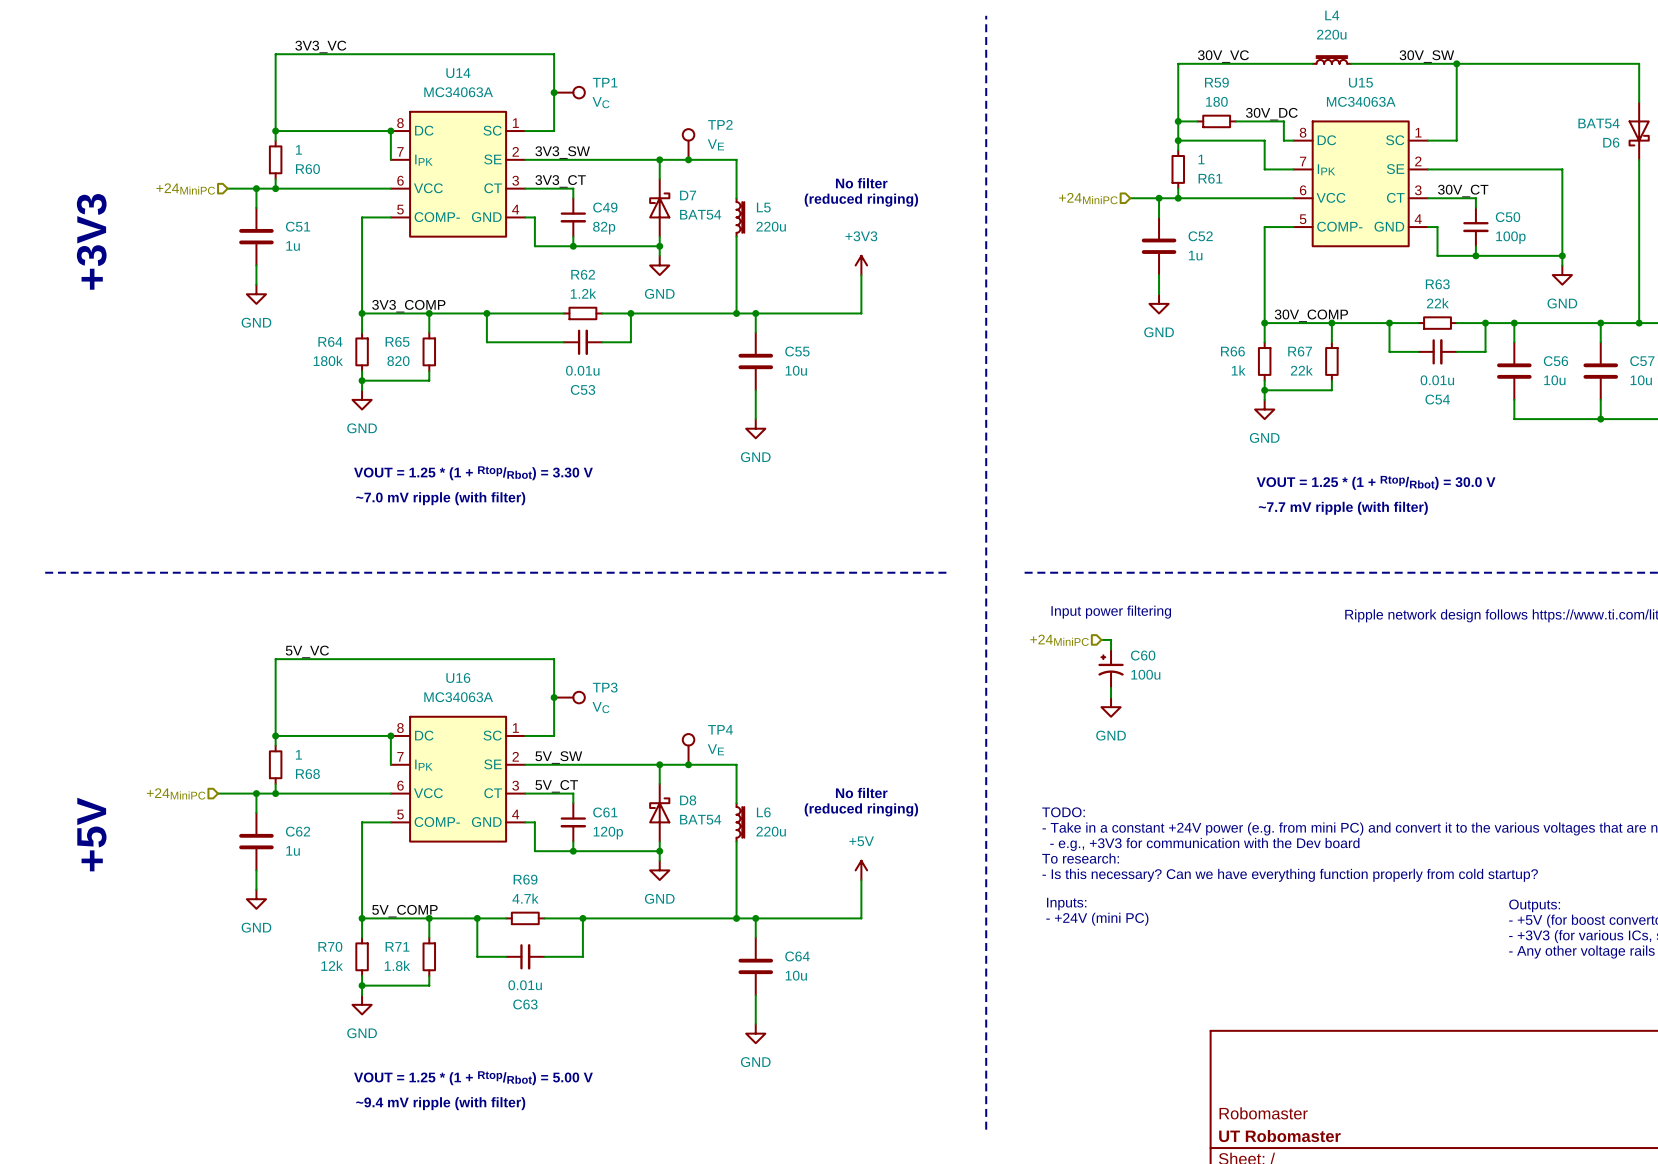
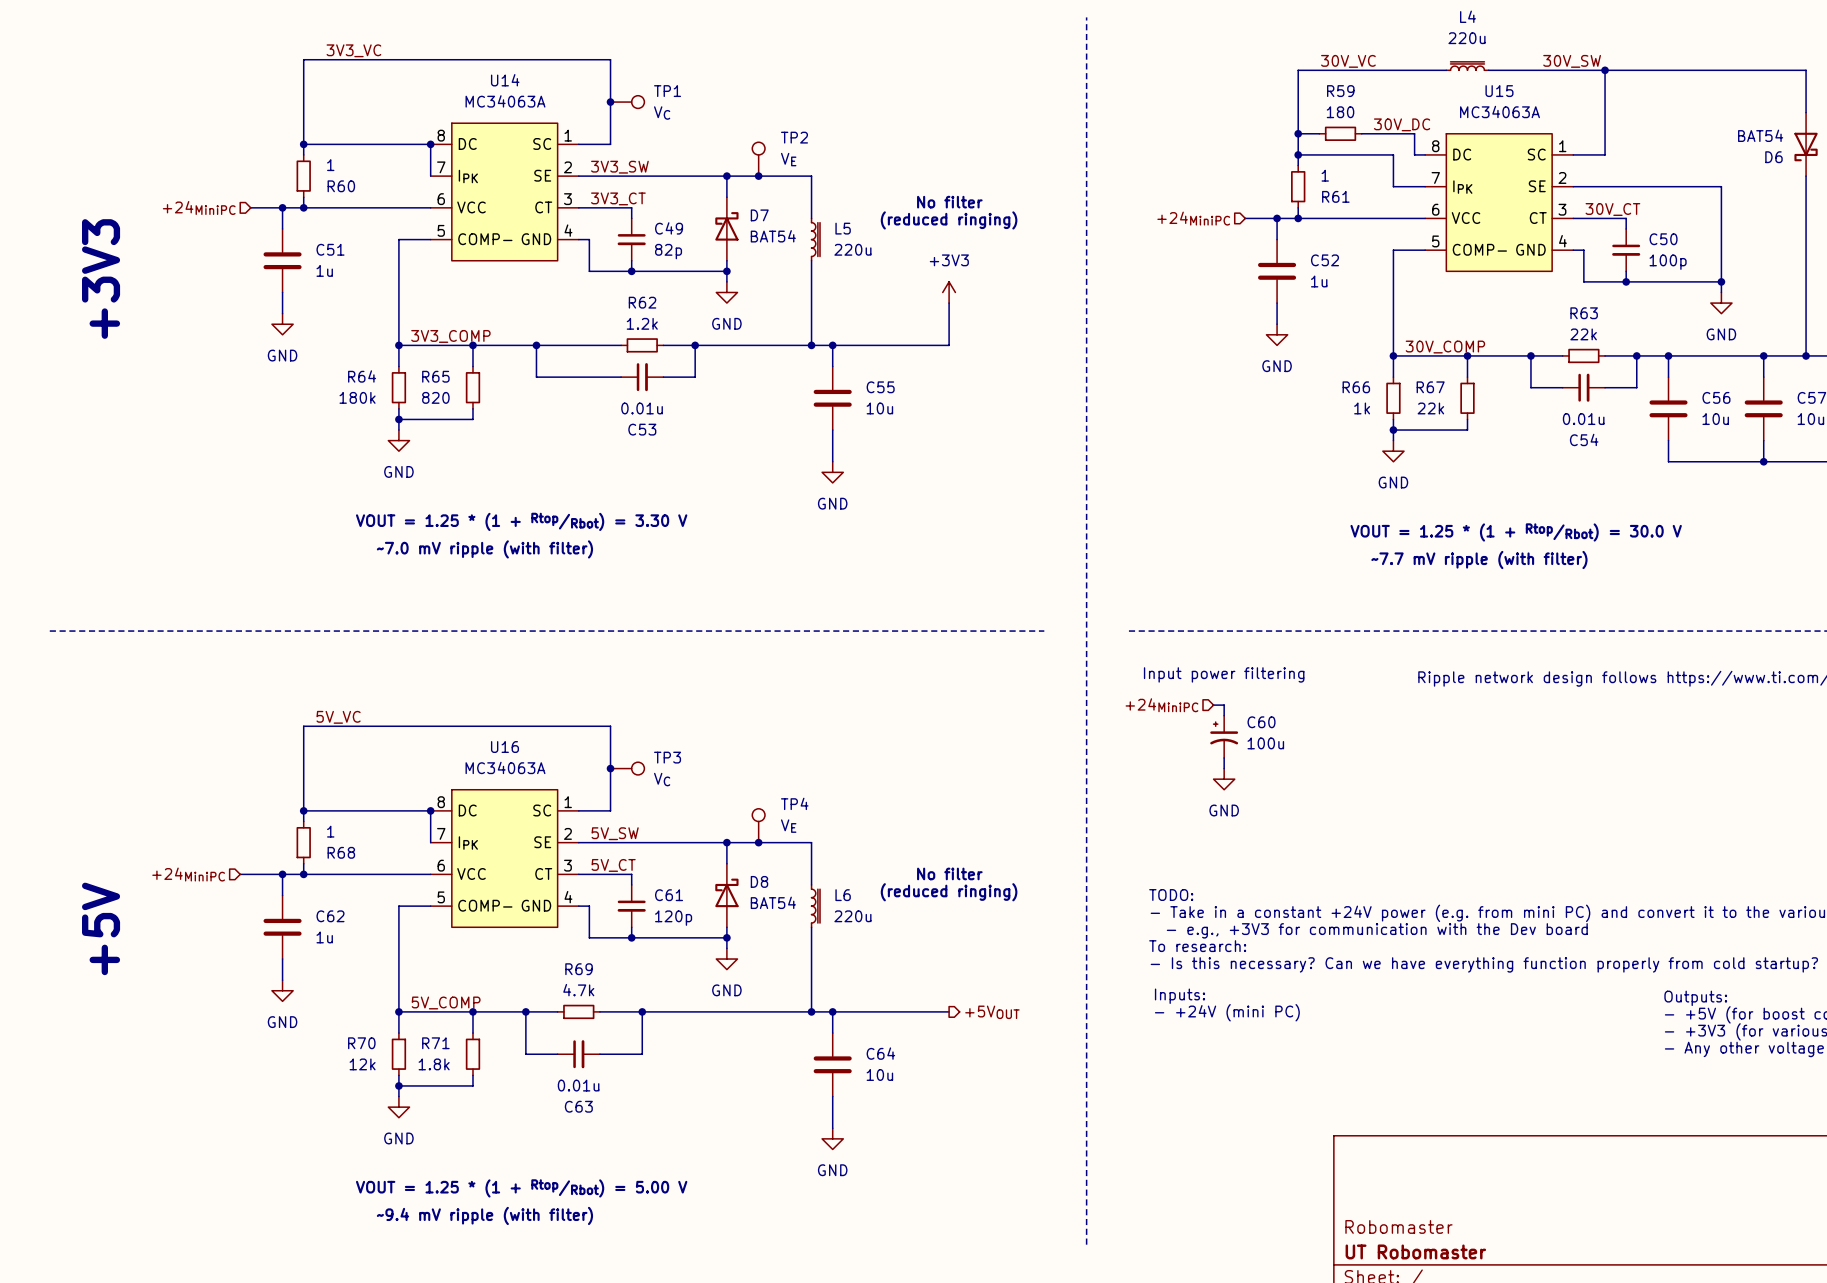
power symbol: +5V (861, 870) -> none
wire: (861, 880) (861, 918) -> none
hierarchical label: none -> +5VOUT (992, 1012)

